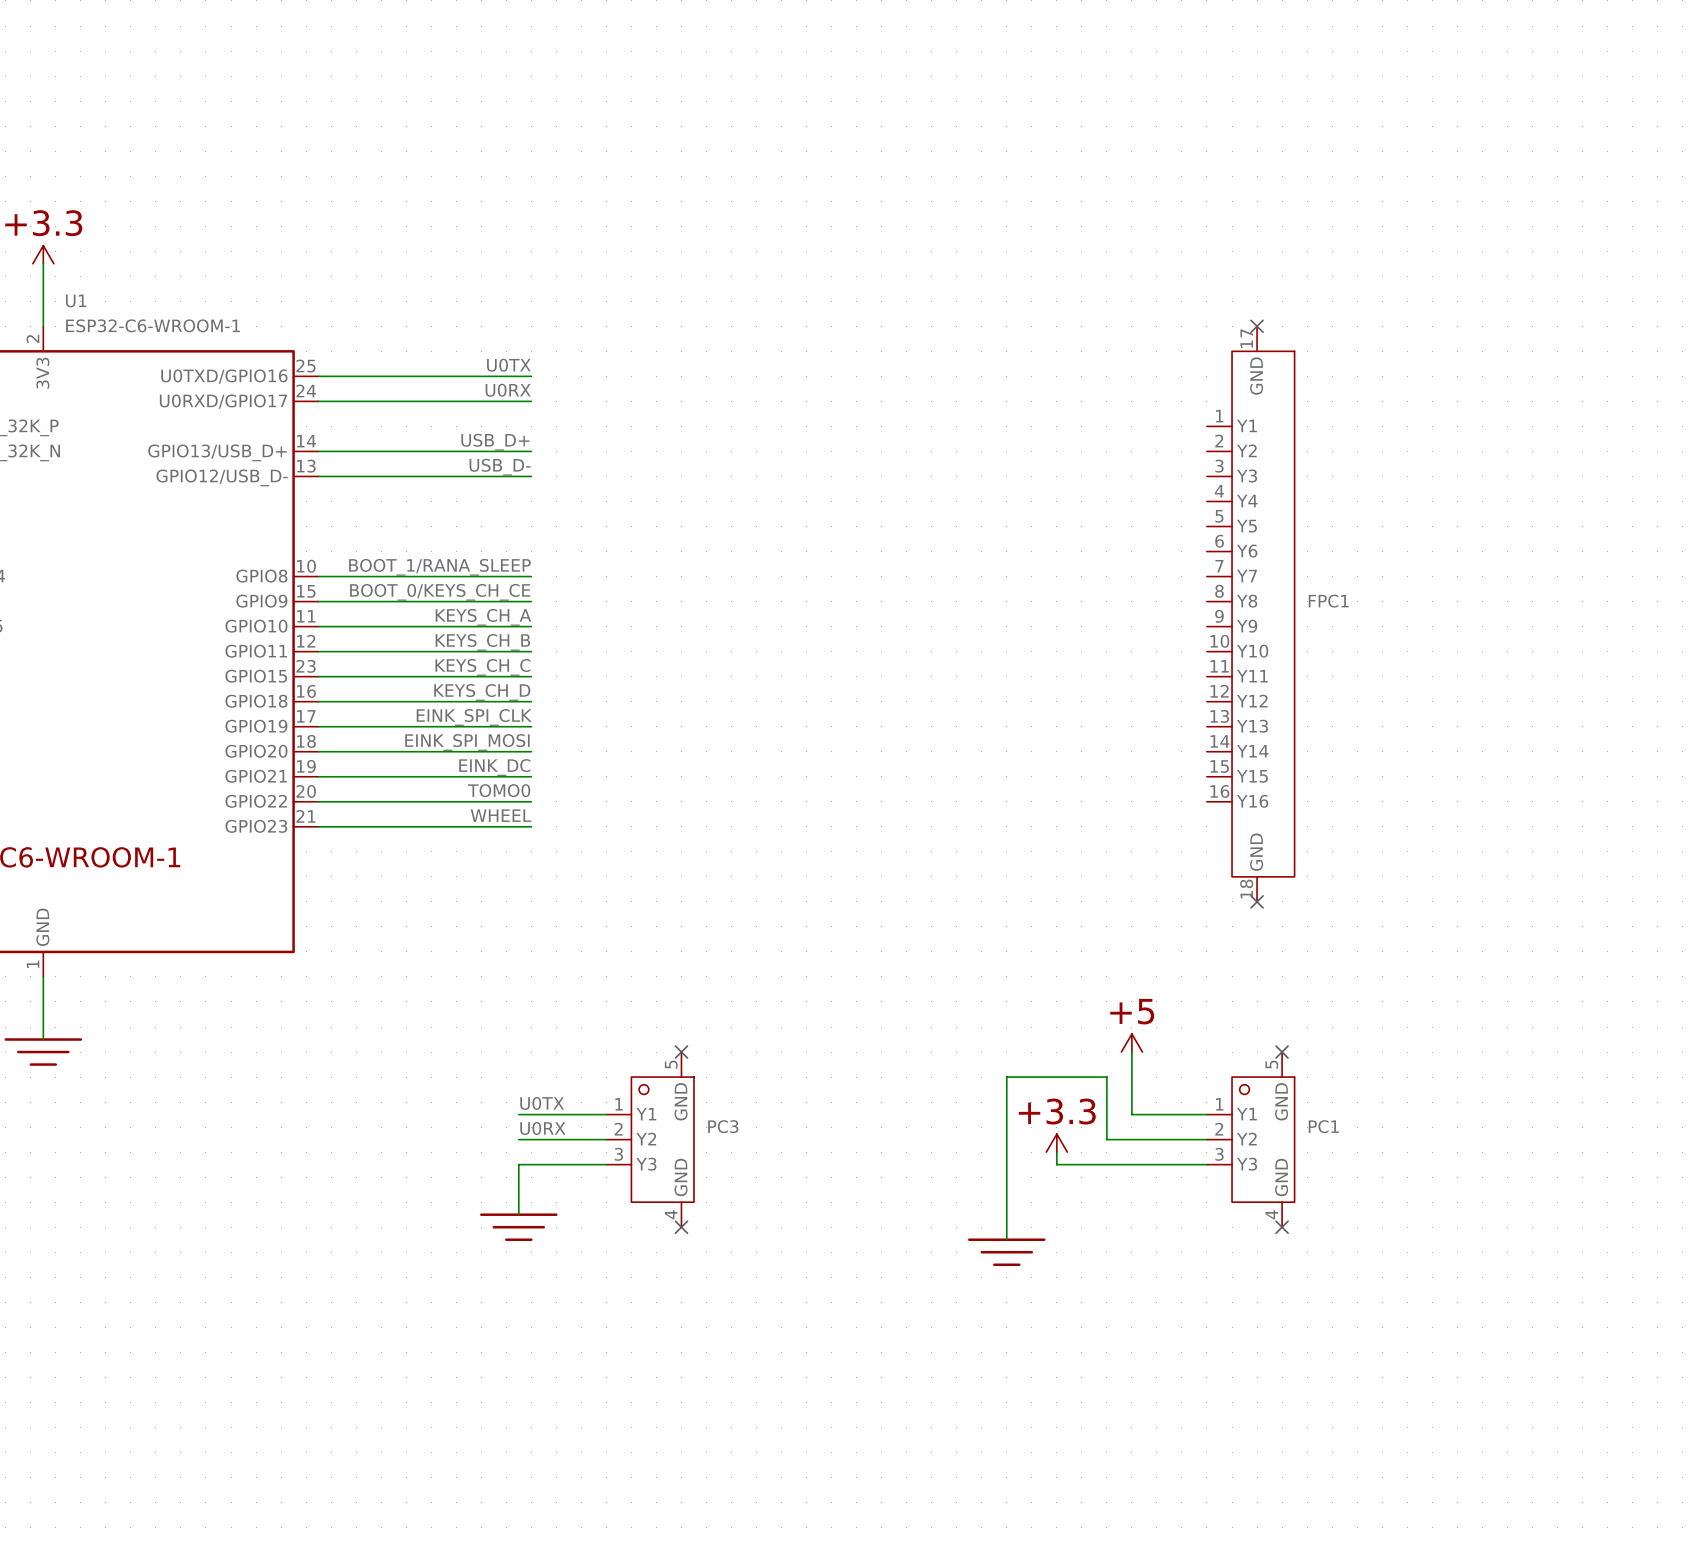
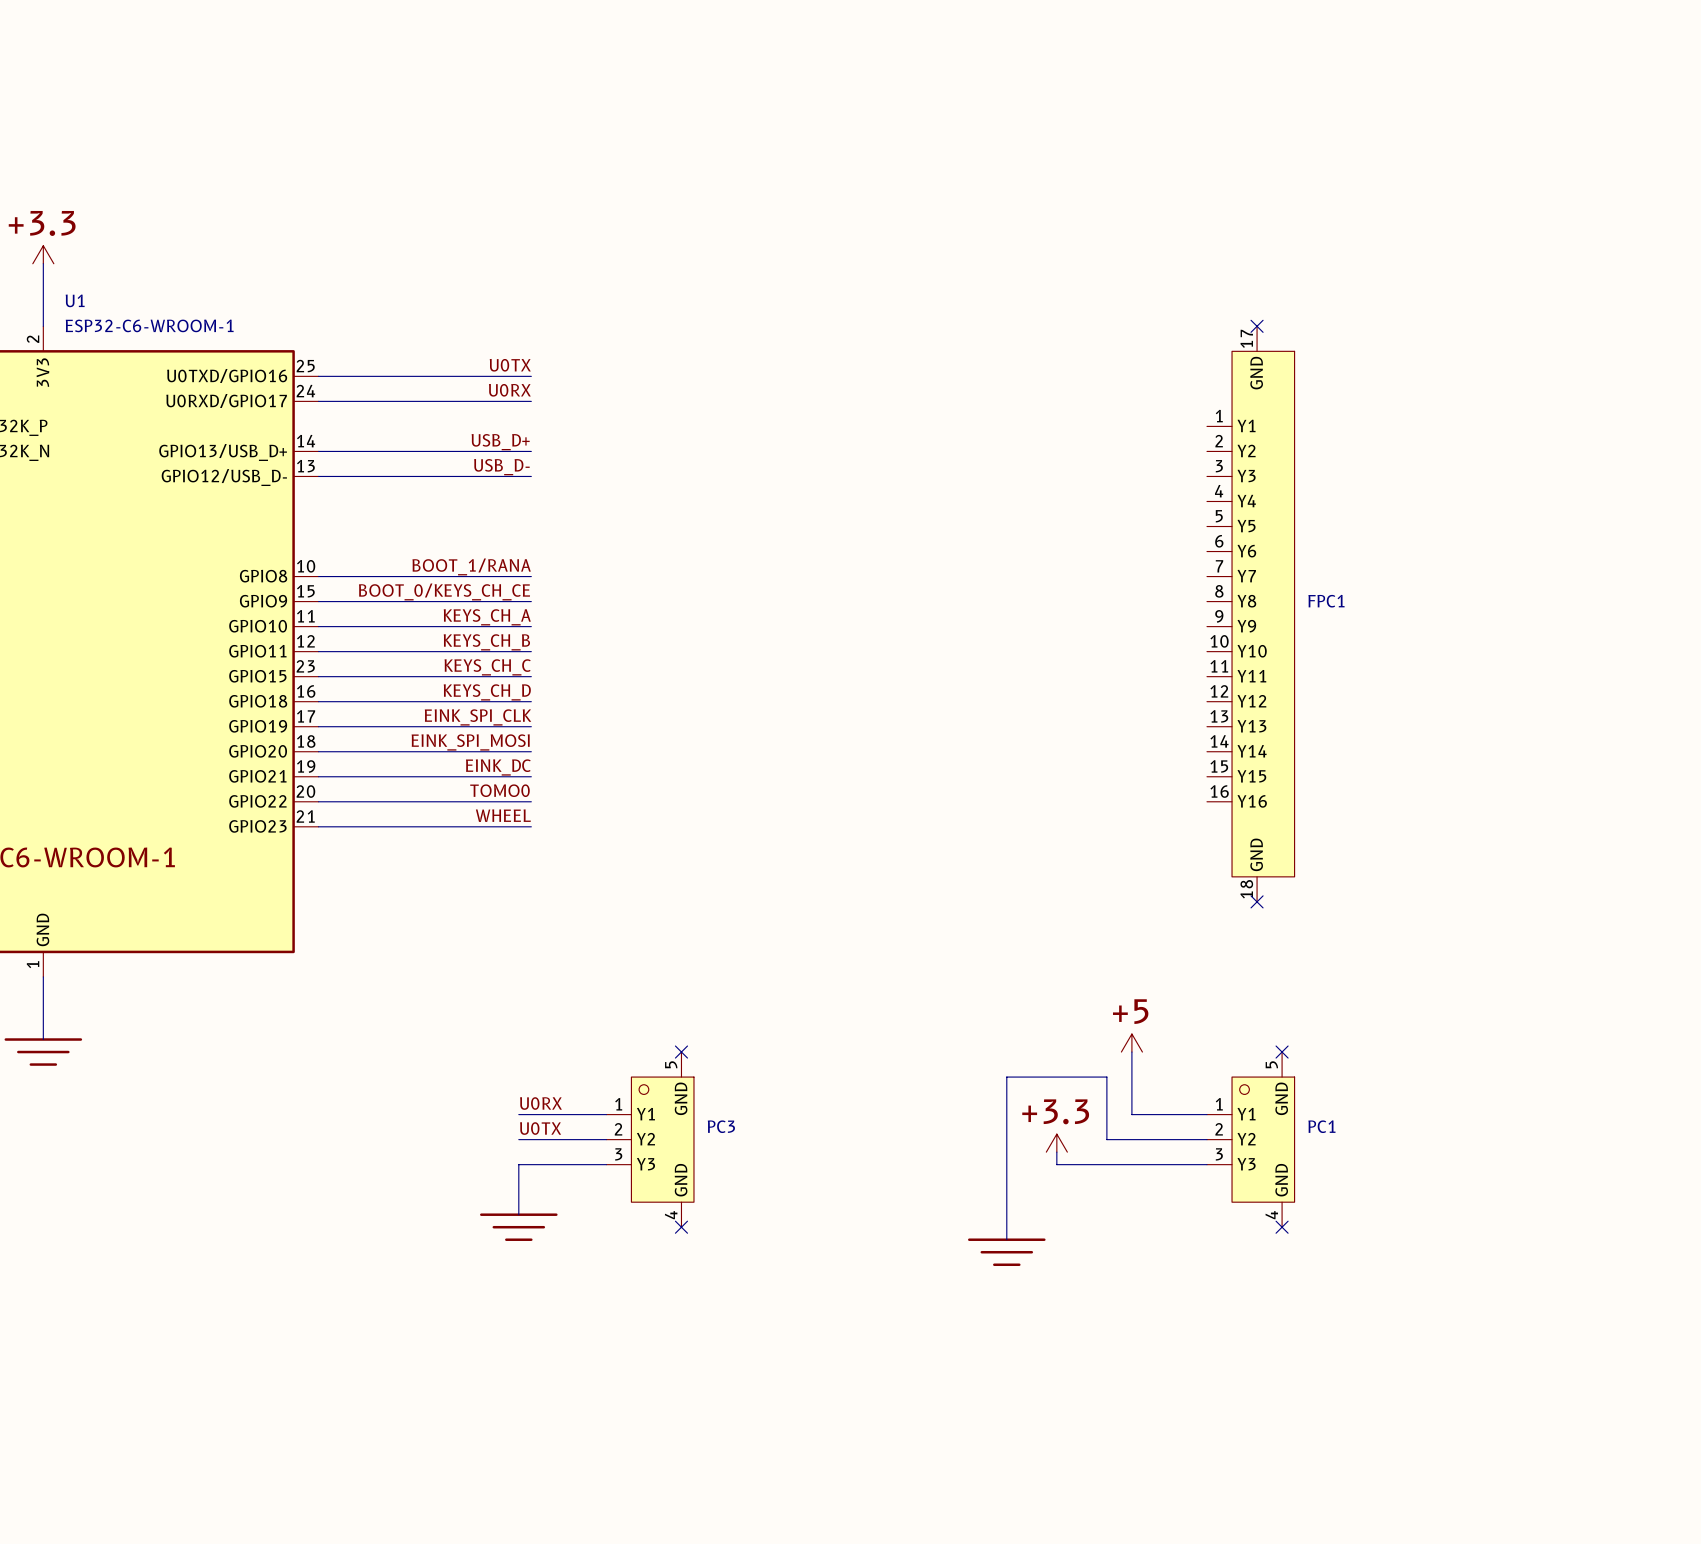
label: BOOT_1/RANA_SLEEP (439, 567) -> BOOT_1/RANA (471, 566)
label: U0TX (542, 1103) -> U0RX (540, 1103)
label: U0RX (542, 1128) -> U0TX (540, 1128)

